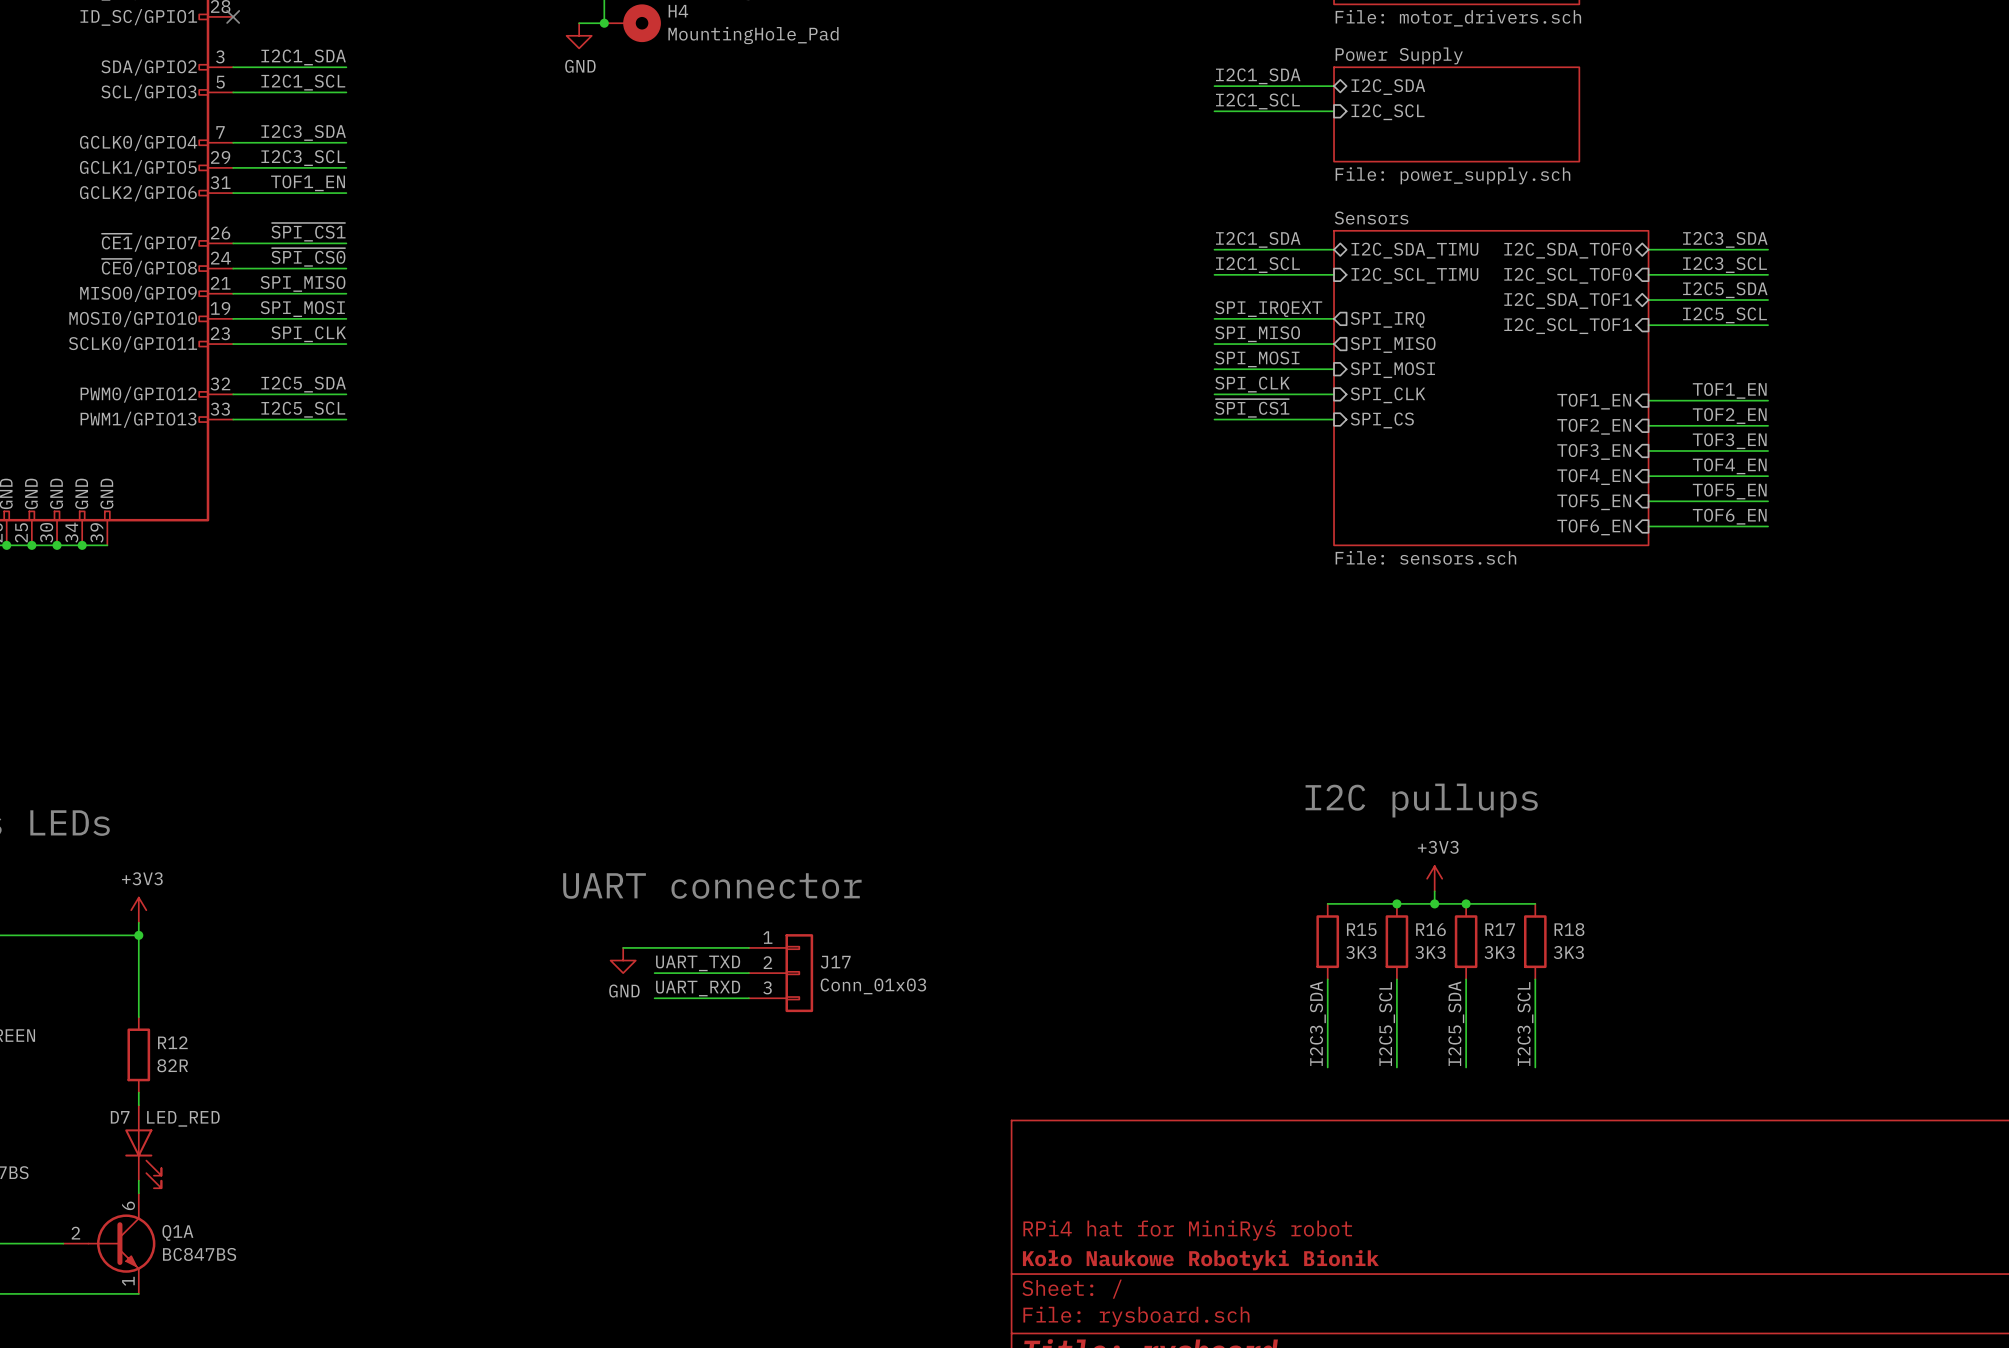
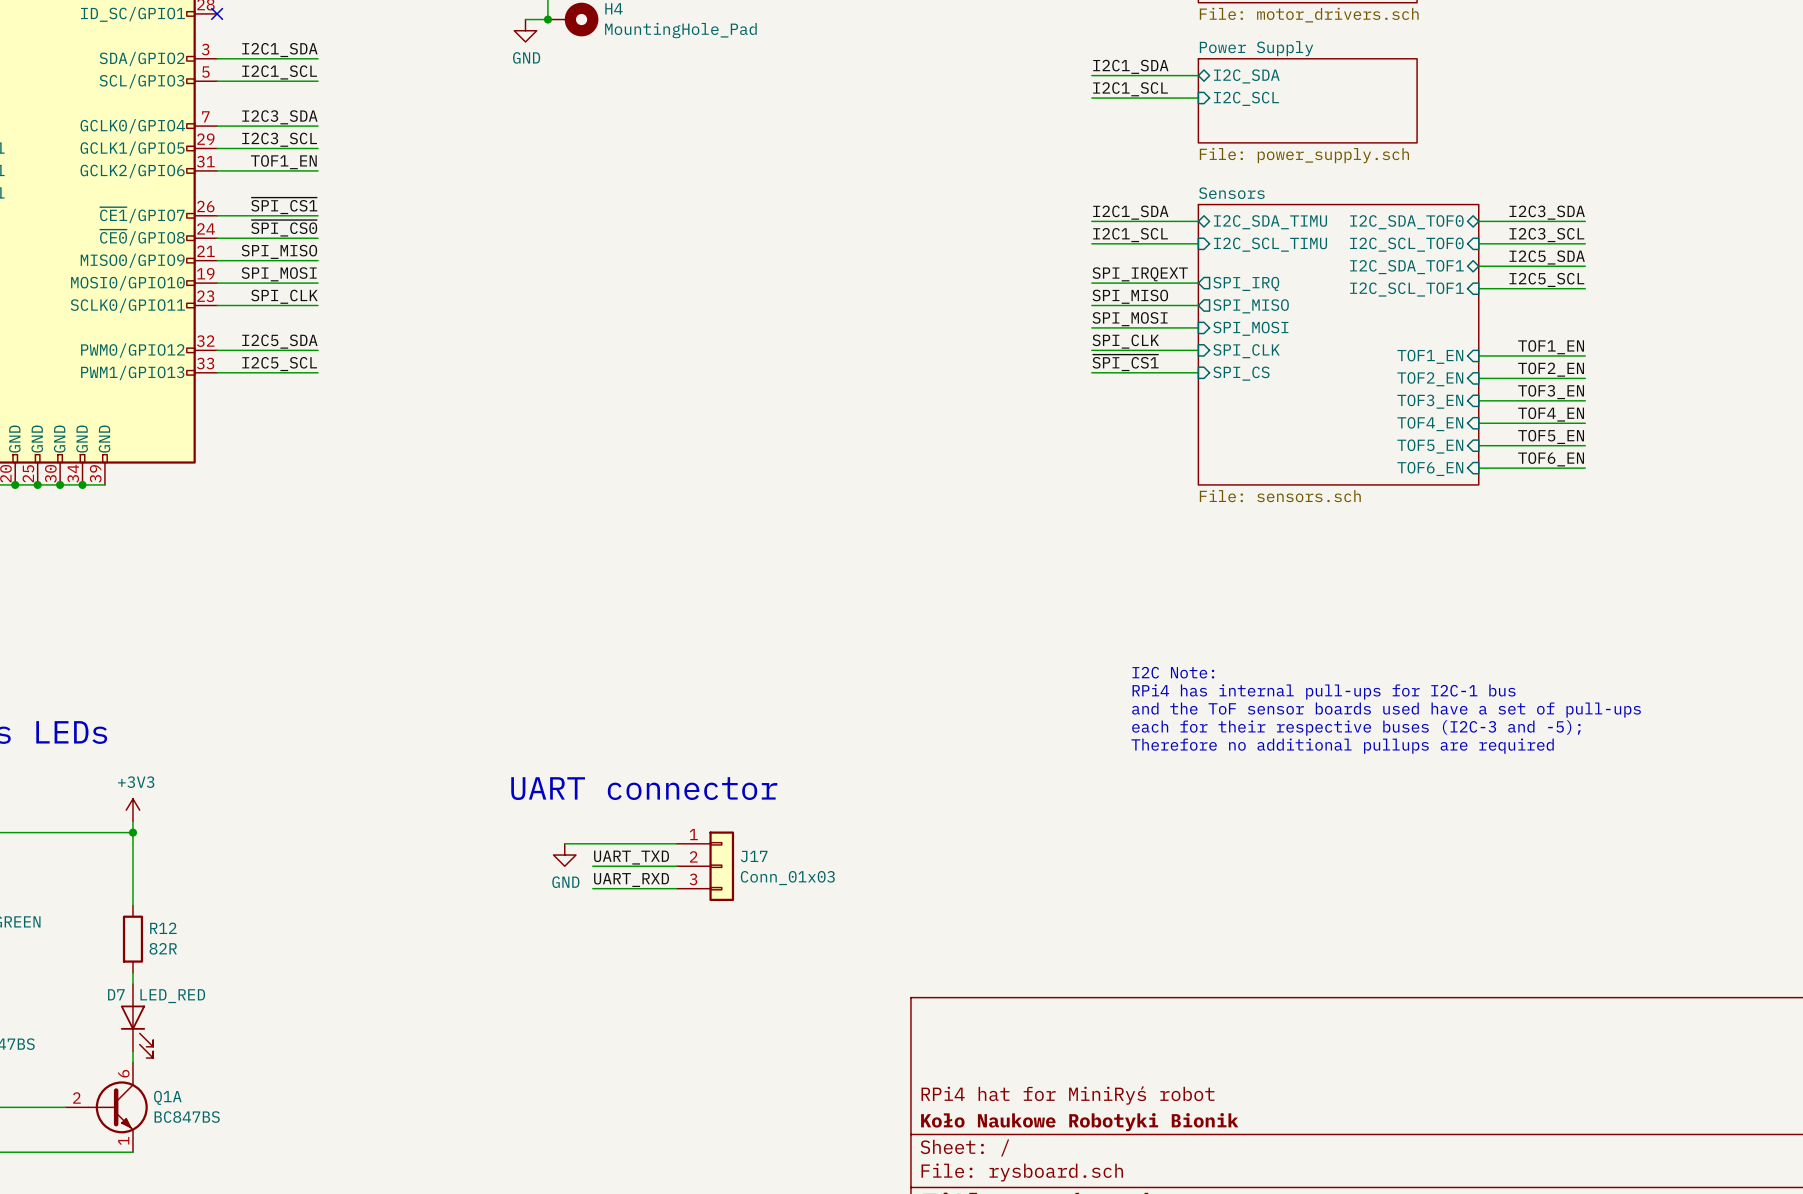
text: none -> I2C Note: (1173, 672)
text: none -> RPi4 has internal pull-ups for I2C-1 bus (1324, 691)
text: none -> and the ToF sensor boards used have a set of pull-ups (1386, 710)
text: I2C pullups (1421, 800) -> none
text: none -> each for their respective buses (I2C-3 and -5); (1356, 727)
text: none -> Therefore no additional pullups are required (1342, 746)
power symbol: +3V3 (1434, 878) -> none
wire: (1434, 891) (1434, 903) -> none
wire: (1327, 903) (1535, 903) -> none
junction: (1396, 903) -> none
junction: (1434, 903) -> none
junction: (1466, 903) -> none
R15: 3K3 (1327, 941) -> none
R16: 3K3 (1396, 941) -> none
R17: 3K3 (1466, 941) -> none
R18: 3K3 (1535, 941) -> none
wire: (1327, 979) (1327, 1067) -> none
wire: (1396, 979) (1396, 1067) -> none
wire: (1466, 979) (1466, 1067) -> none
wire: (1535, 979) (1535, 1067) -> none
label: I2C3_SDA (1317, 1023) -> none
label: I2C5_SDA (1456, 1023) -> none
label: I2C5_SCL (1387, 1024) -> none
label: I2C3_SCL (1525, 1024) -> none

